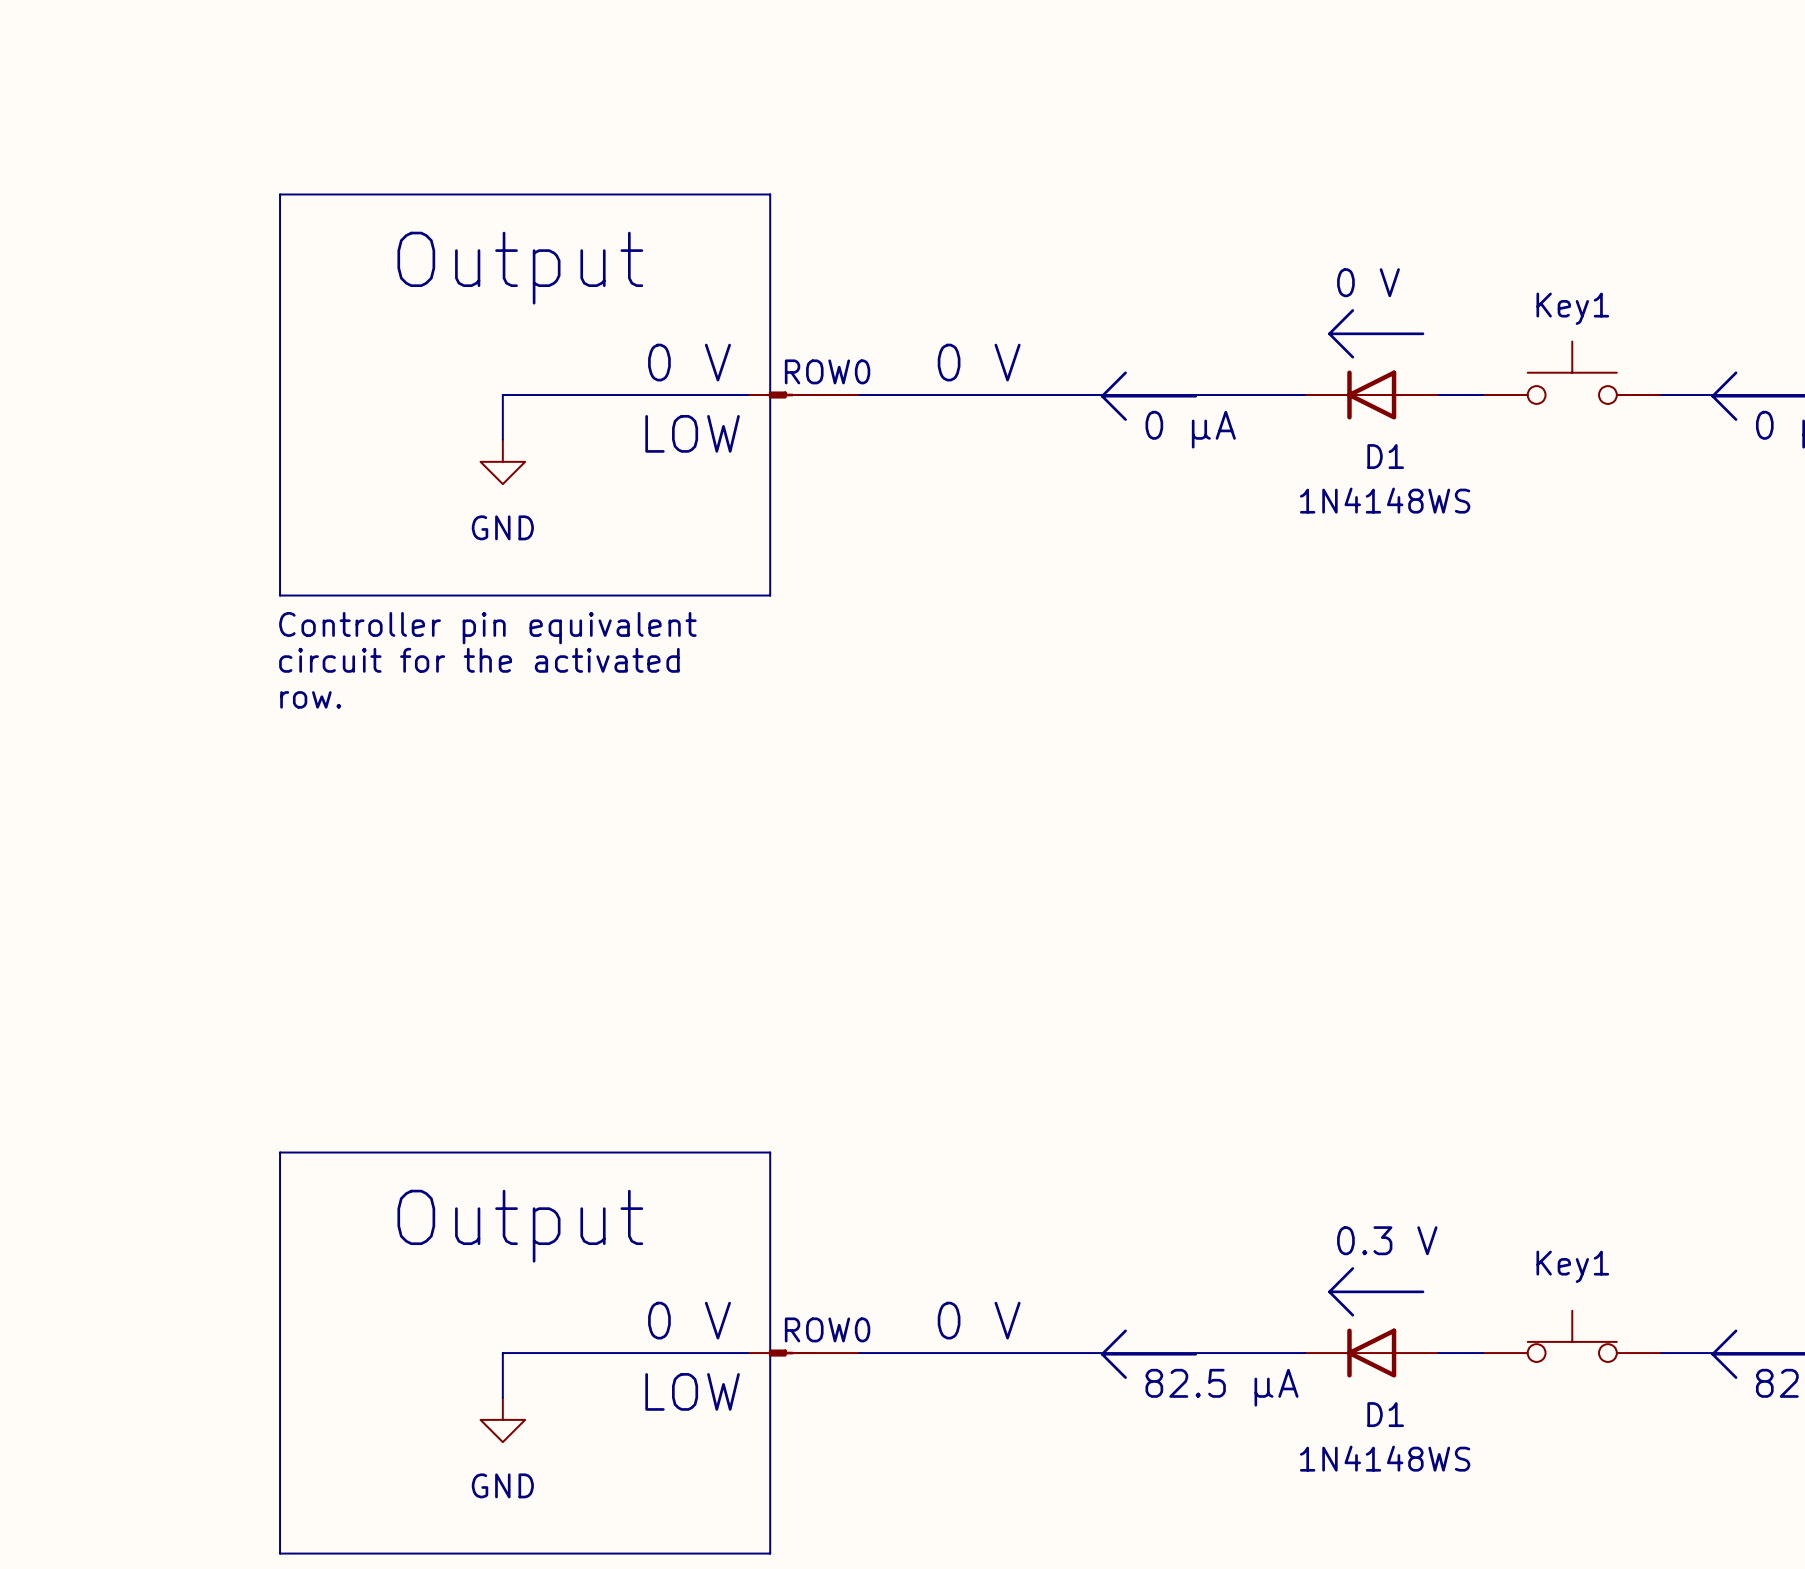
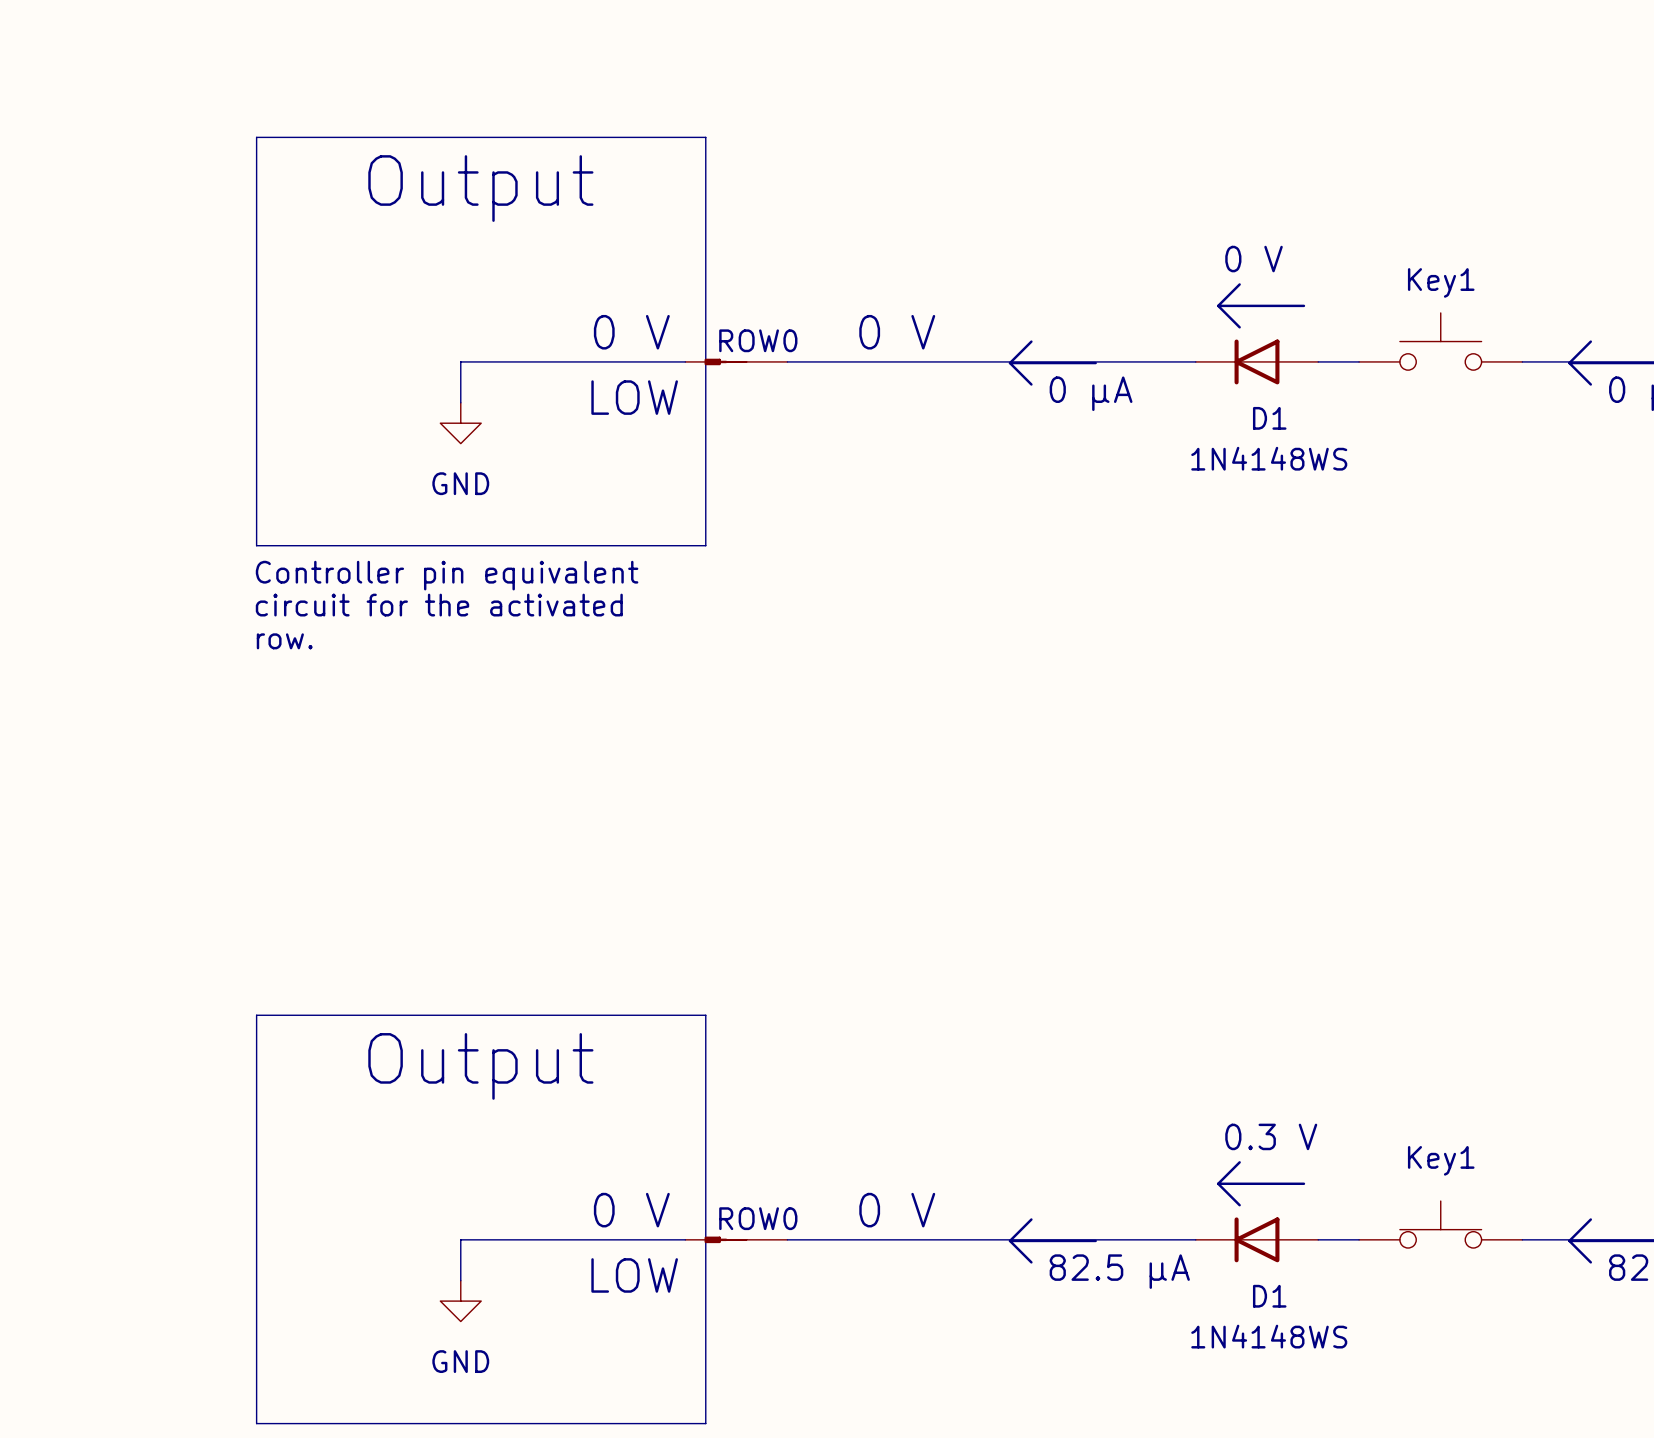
line: (280, 194) (770, 194) -> (256, 178) (256, 137) (705, 137) (705, 178)
Output name position: Output (520, 268) -> Output (480, 188)
line: (280, 1152) (770, 1152) -> (256, 1056) (256, 1015) (705, 1015) (705, 1056)
Output name position: Output (520, 1226) -> Output (480, 1066)

